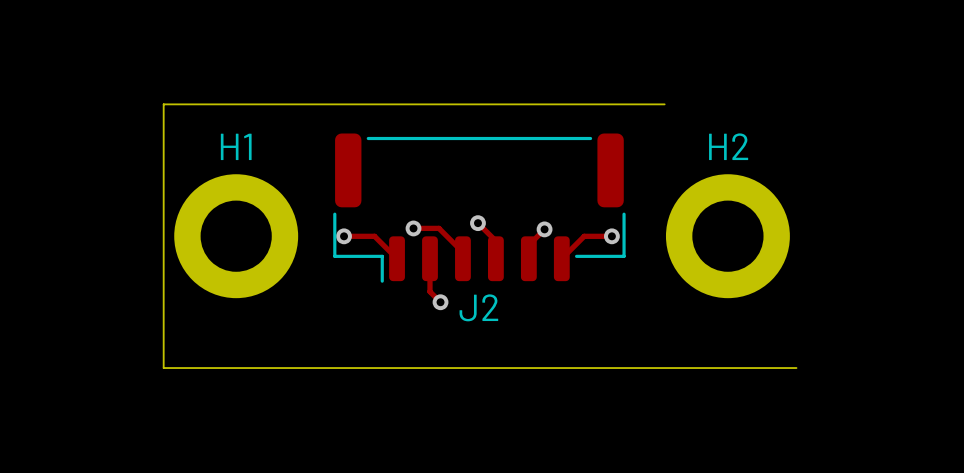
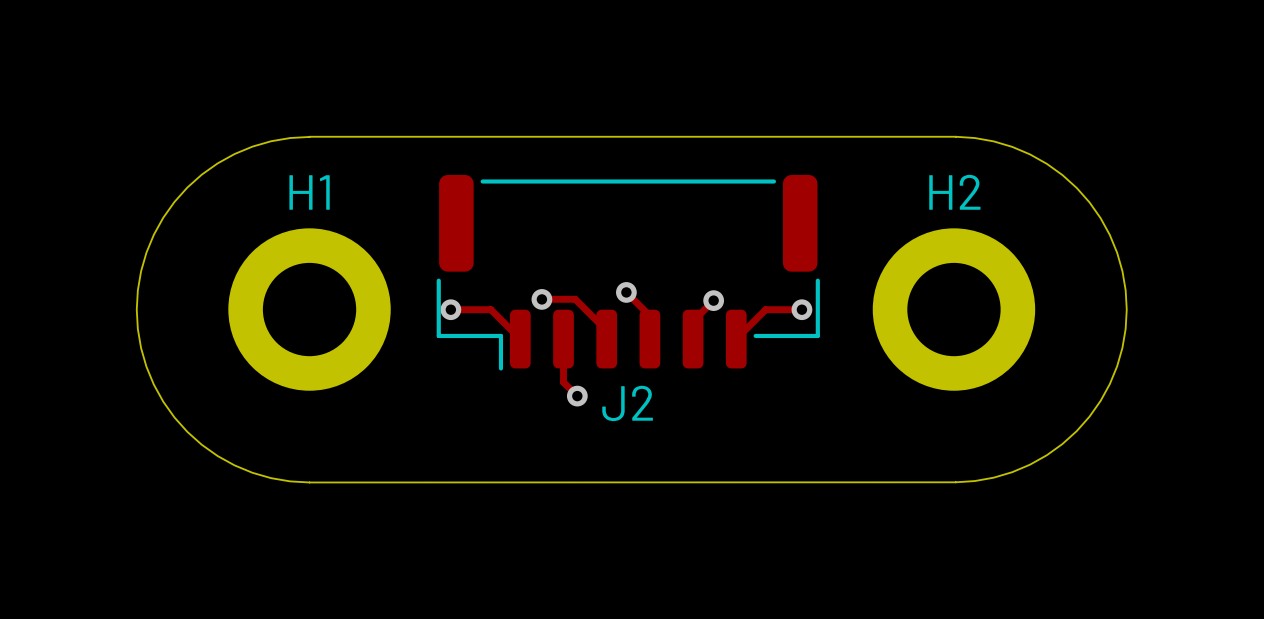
board edge: (236, 104) (163, 104) (163, 368) (796, 368) -> (309, 136) (271, 141) (252, 146) (234, 154) (201, 174) (174, 201) (163, 217) (146, 252) (141, 271) (137, 290) (137, 329) (146, 366) (153, 384) (163, 401) (187, 431) (201, 444) (234, 465) (271, 478) (309, 482) (955, 482) (993, 477) (1030, 464) (1062, 444) (1089, 416) (1109, 384) (1117, 366) (1122, 347) (1126, 309) (1122, 271) (1109, 235) (1100, 218) (1076, 187) (1046, 163) (1012, 146) (974, 138) (871, 136)

